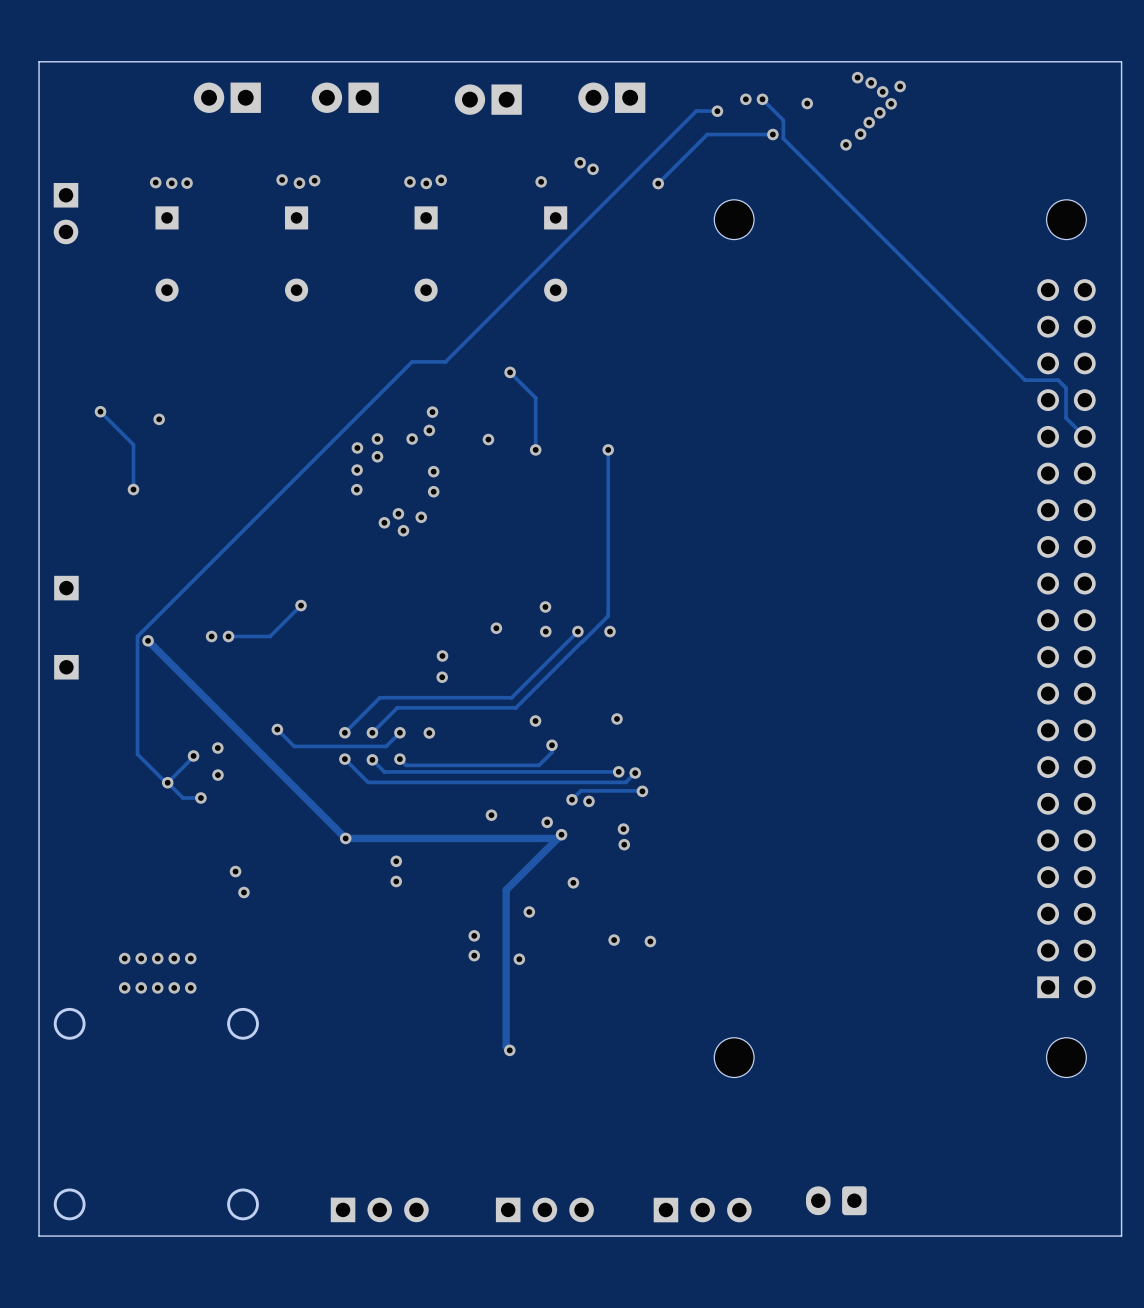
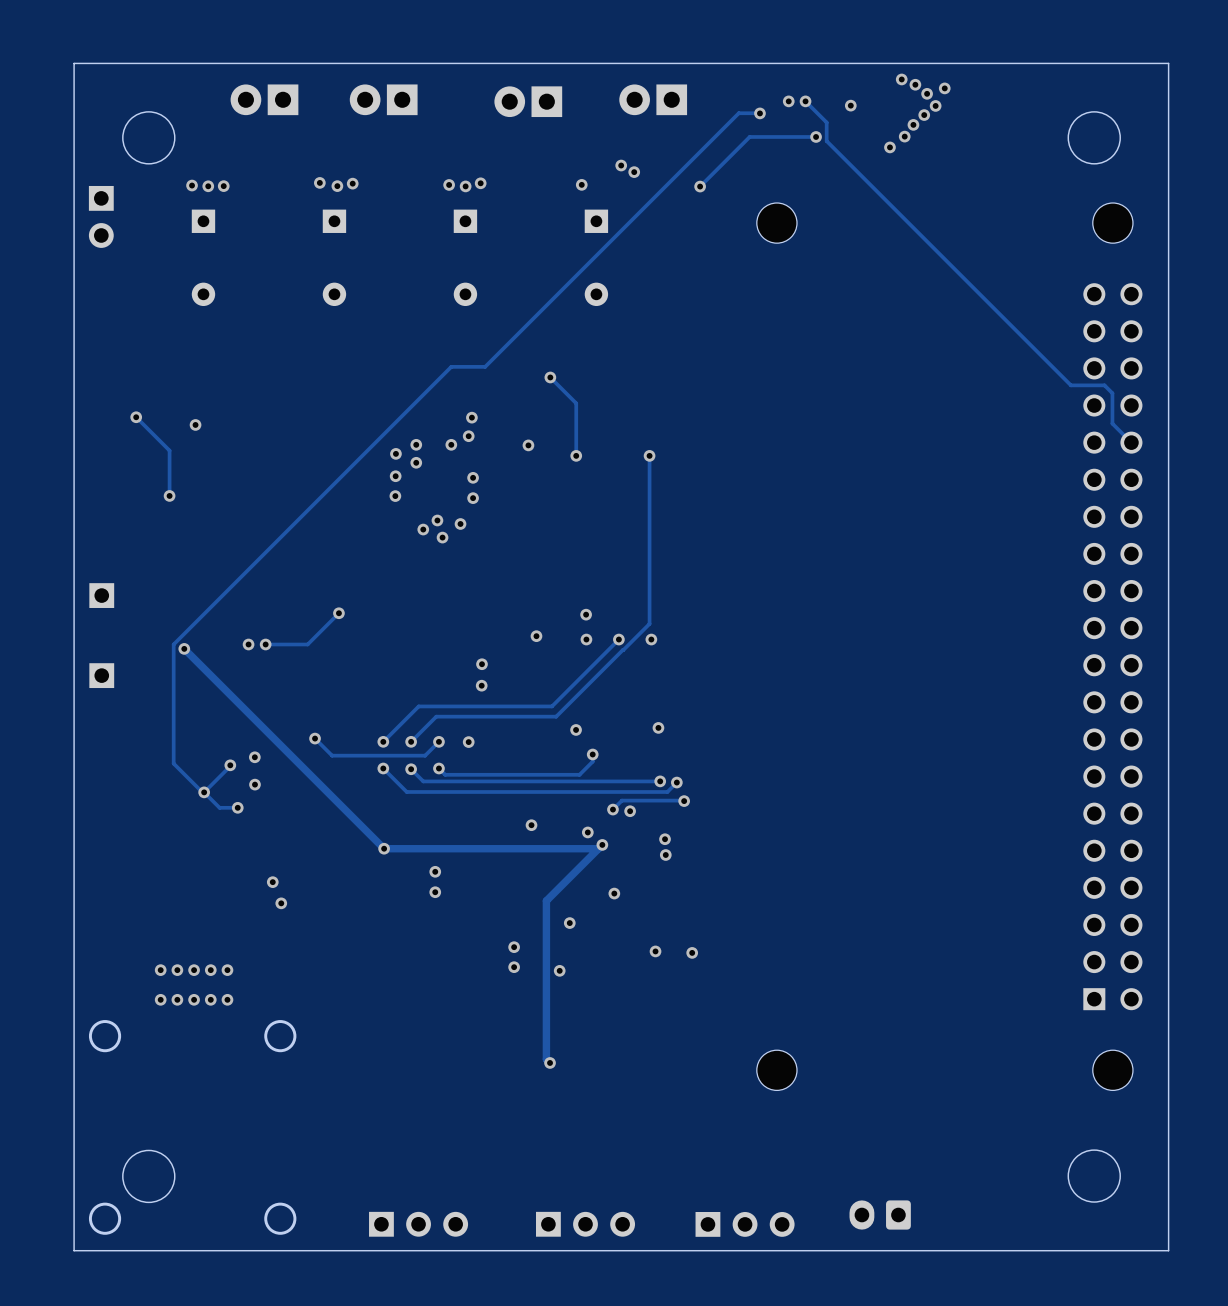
round board edge: none -> [122, 111, 176, 165]
round board edge: none -> [1067, 111, 1121, 165]
round board edge: none -> [1067, 1149, 1121, 1203]
round board edge: none -> [122, 1149, 176, 1204]

